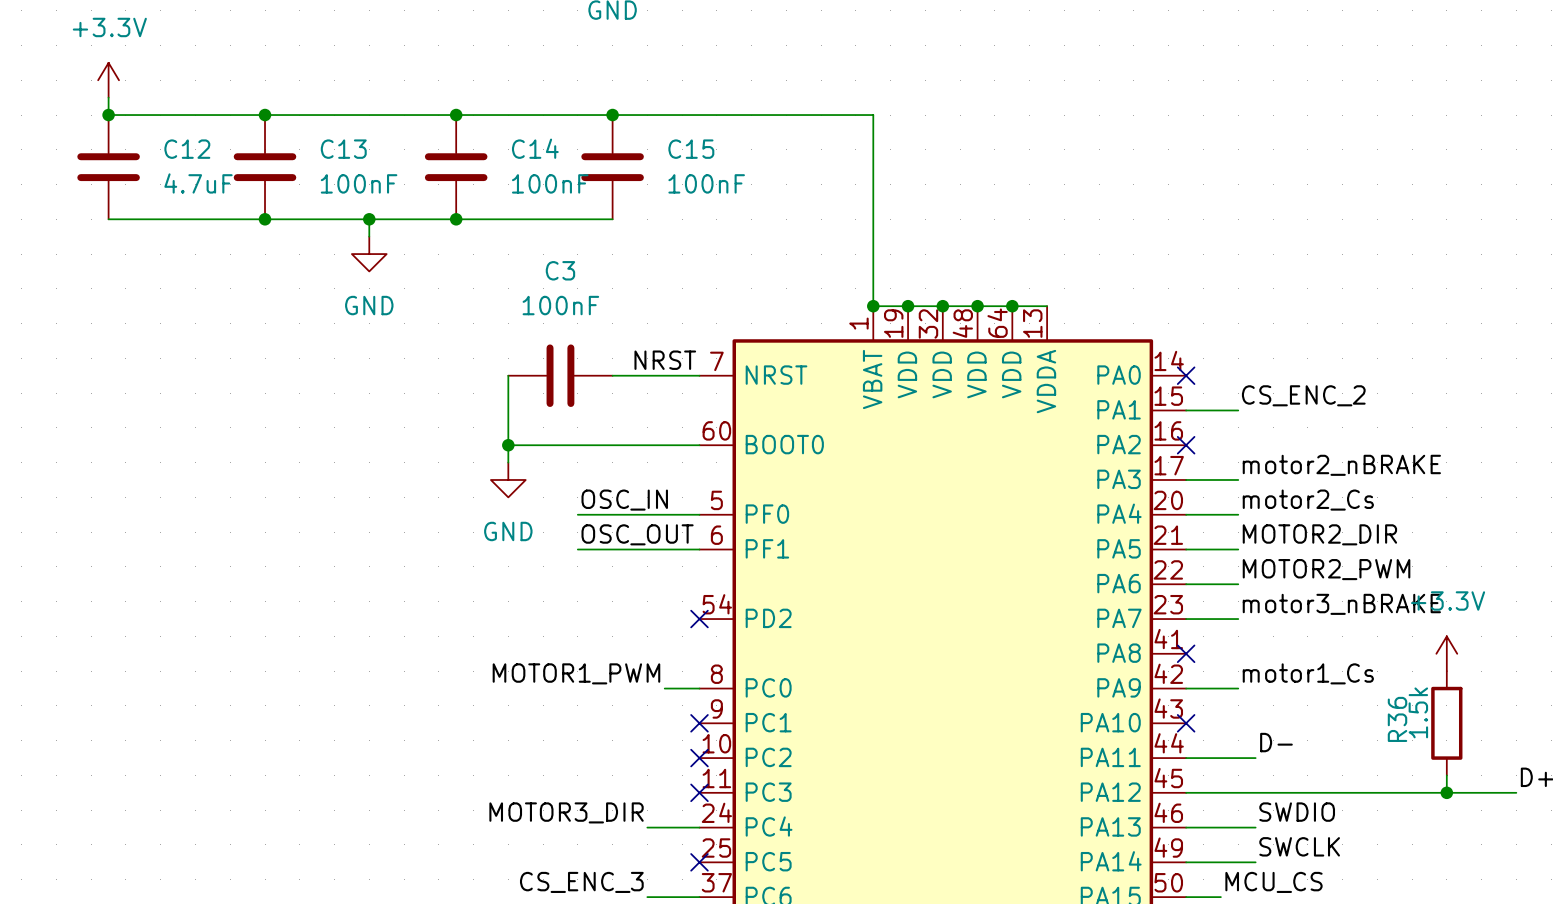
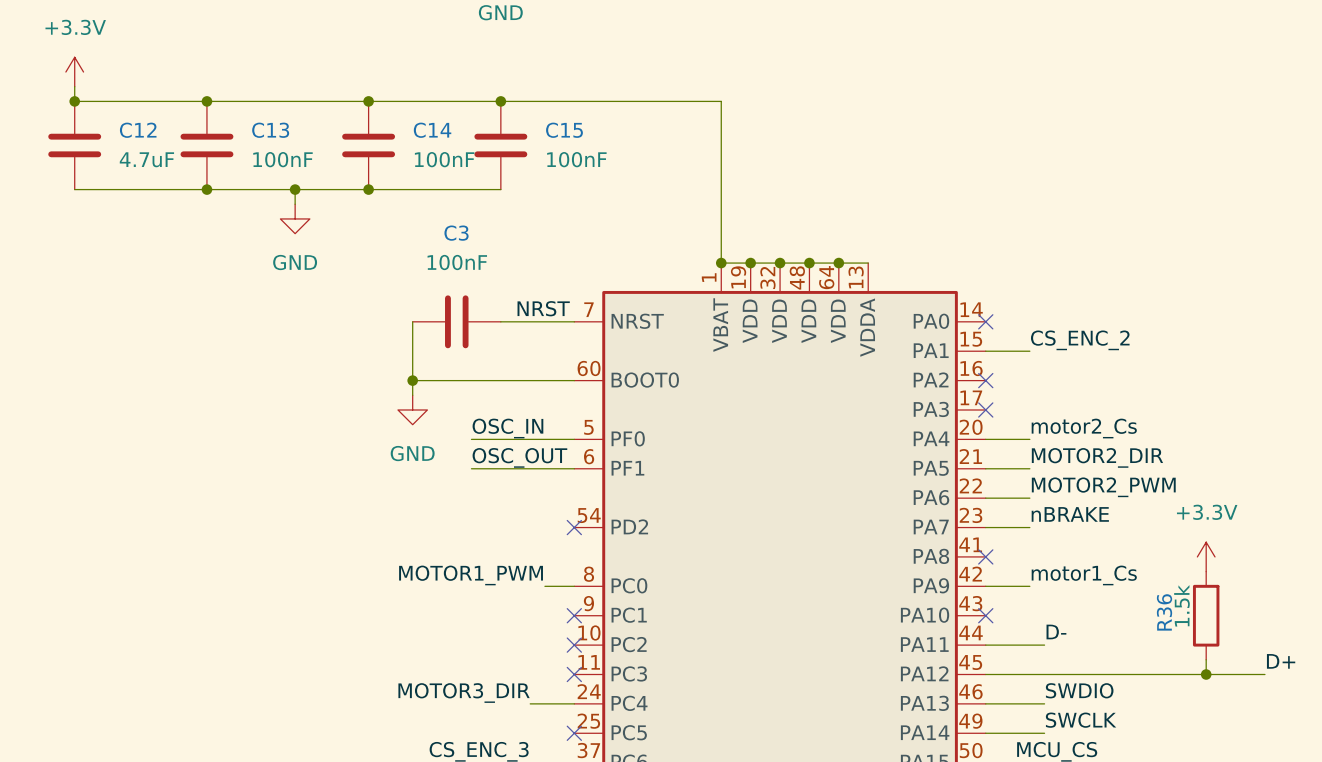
label: motor2_nBRAKE (1341, 465) -> none
wire: (1186, 479) (1238, 479) -> none
no-connect mark: none -> (985, 409)
label: motor3_nBRAKE (1341, 604) -> nBRAKE (1070, 514)

